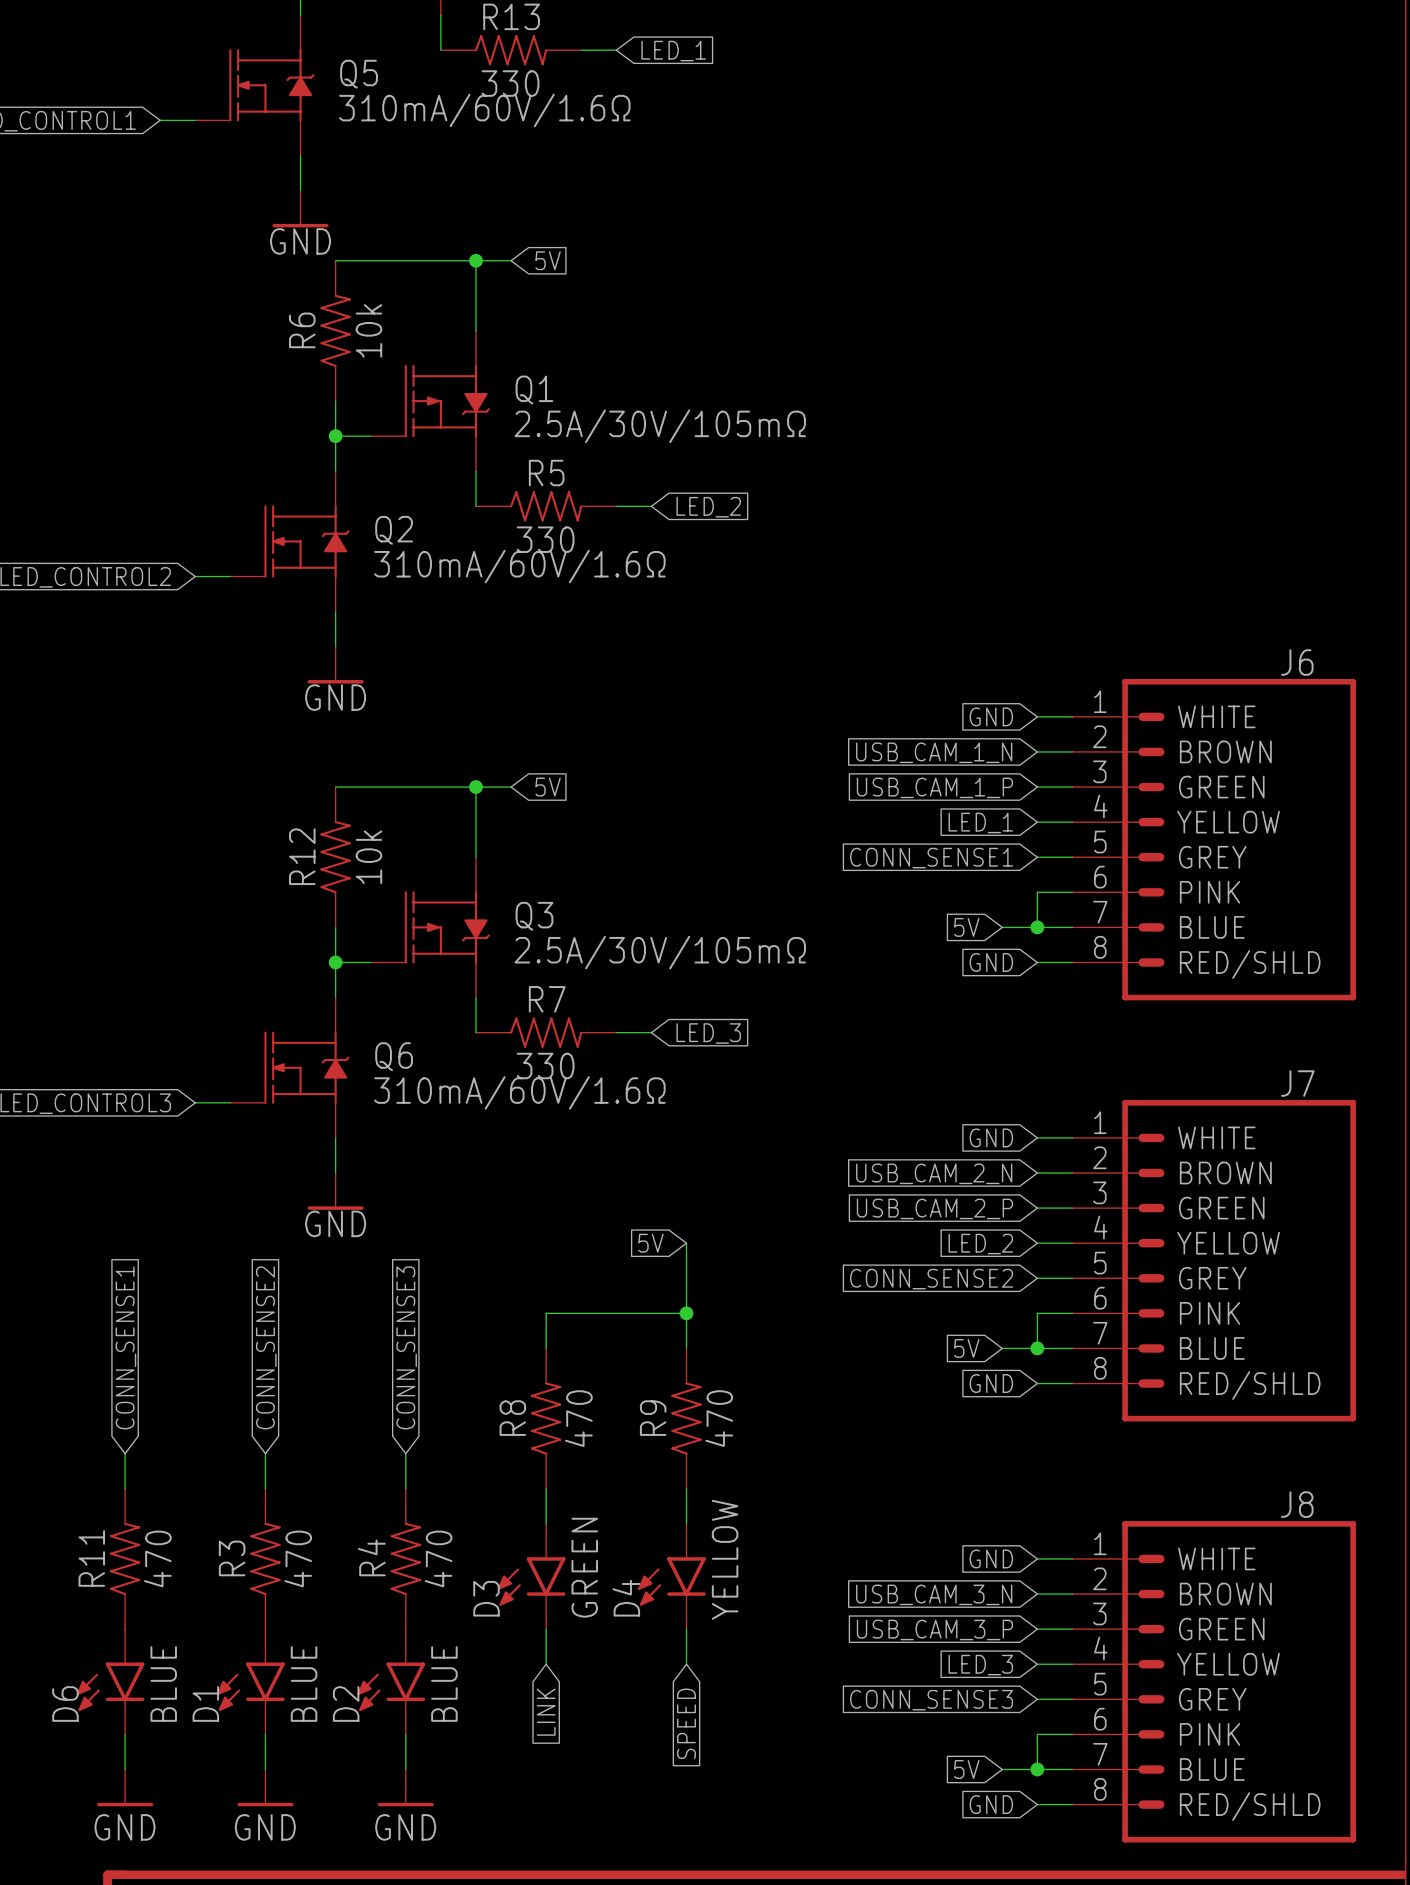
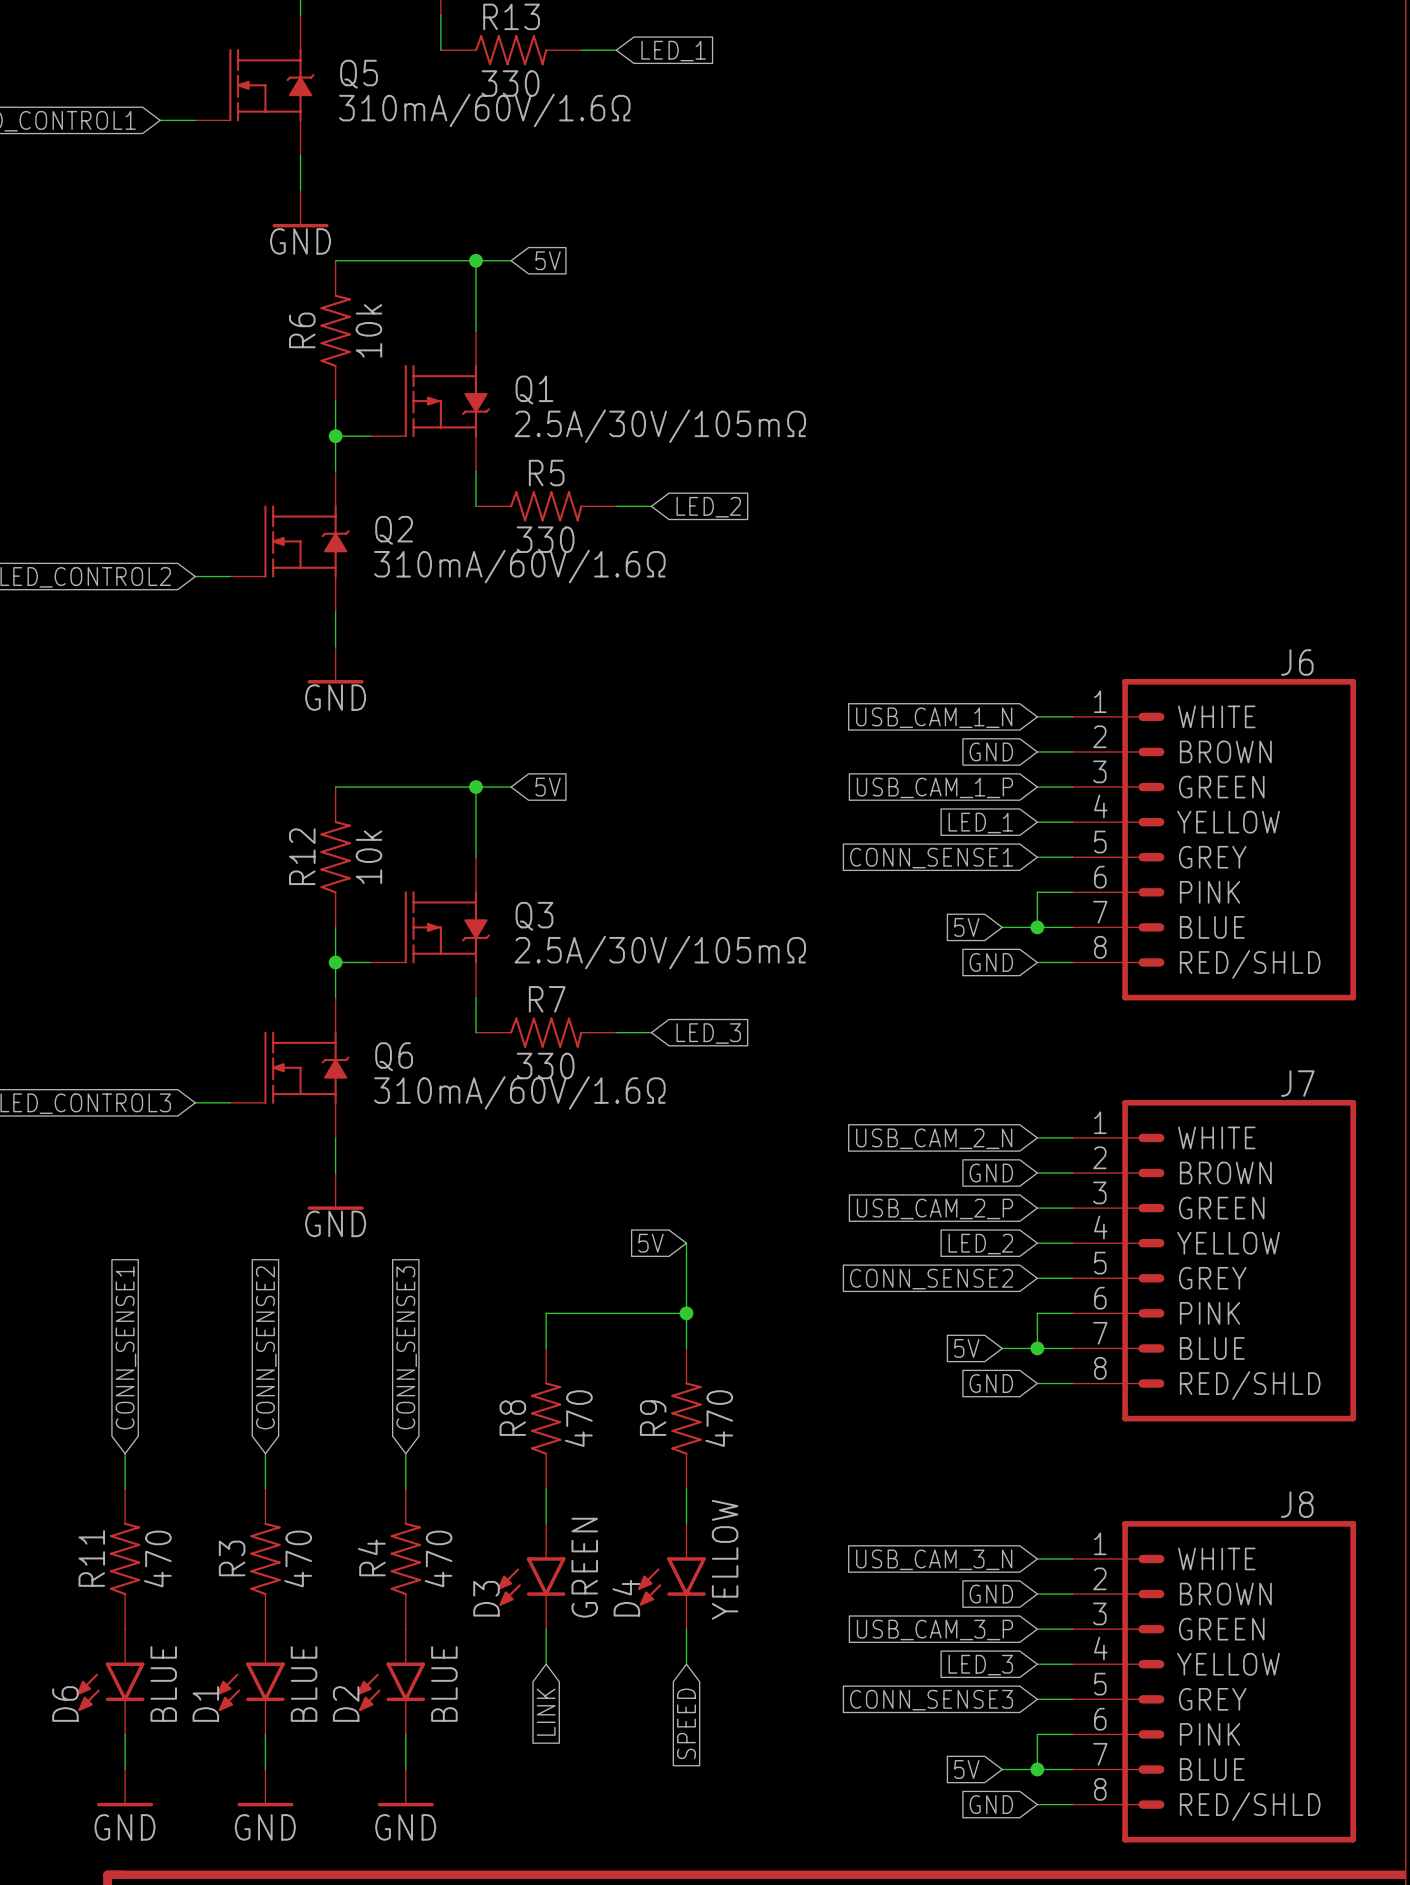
global label: GND (991, 716) -> USB_CAM_1_N (934, 717)
global label: USB_CAM_1_N (934, 752) -> GND (991, 751)
global label: GND (991, 1137) -> USB_CAM_2_N (934, 1138)
global label: USB_CAM_2_N (934, 1173) -> GND (991, 1173)
global label: GND (991, 1558) -> USB_CAM_3_N (934, 1559)
global label: USB_CAM_3_N (934, 1594) -> GND (991, 1594)

